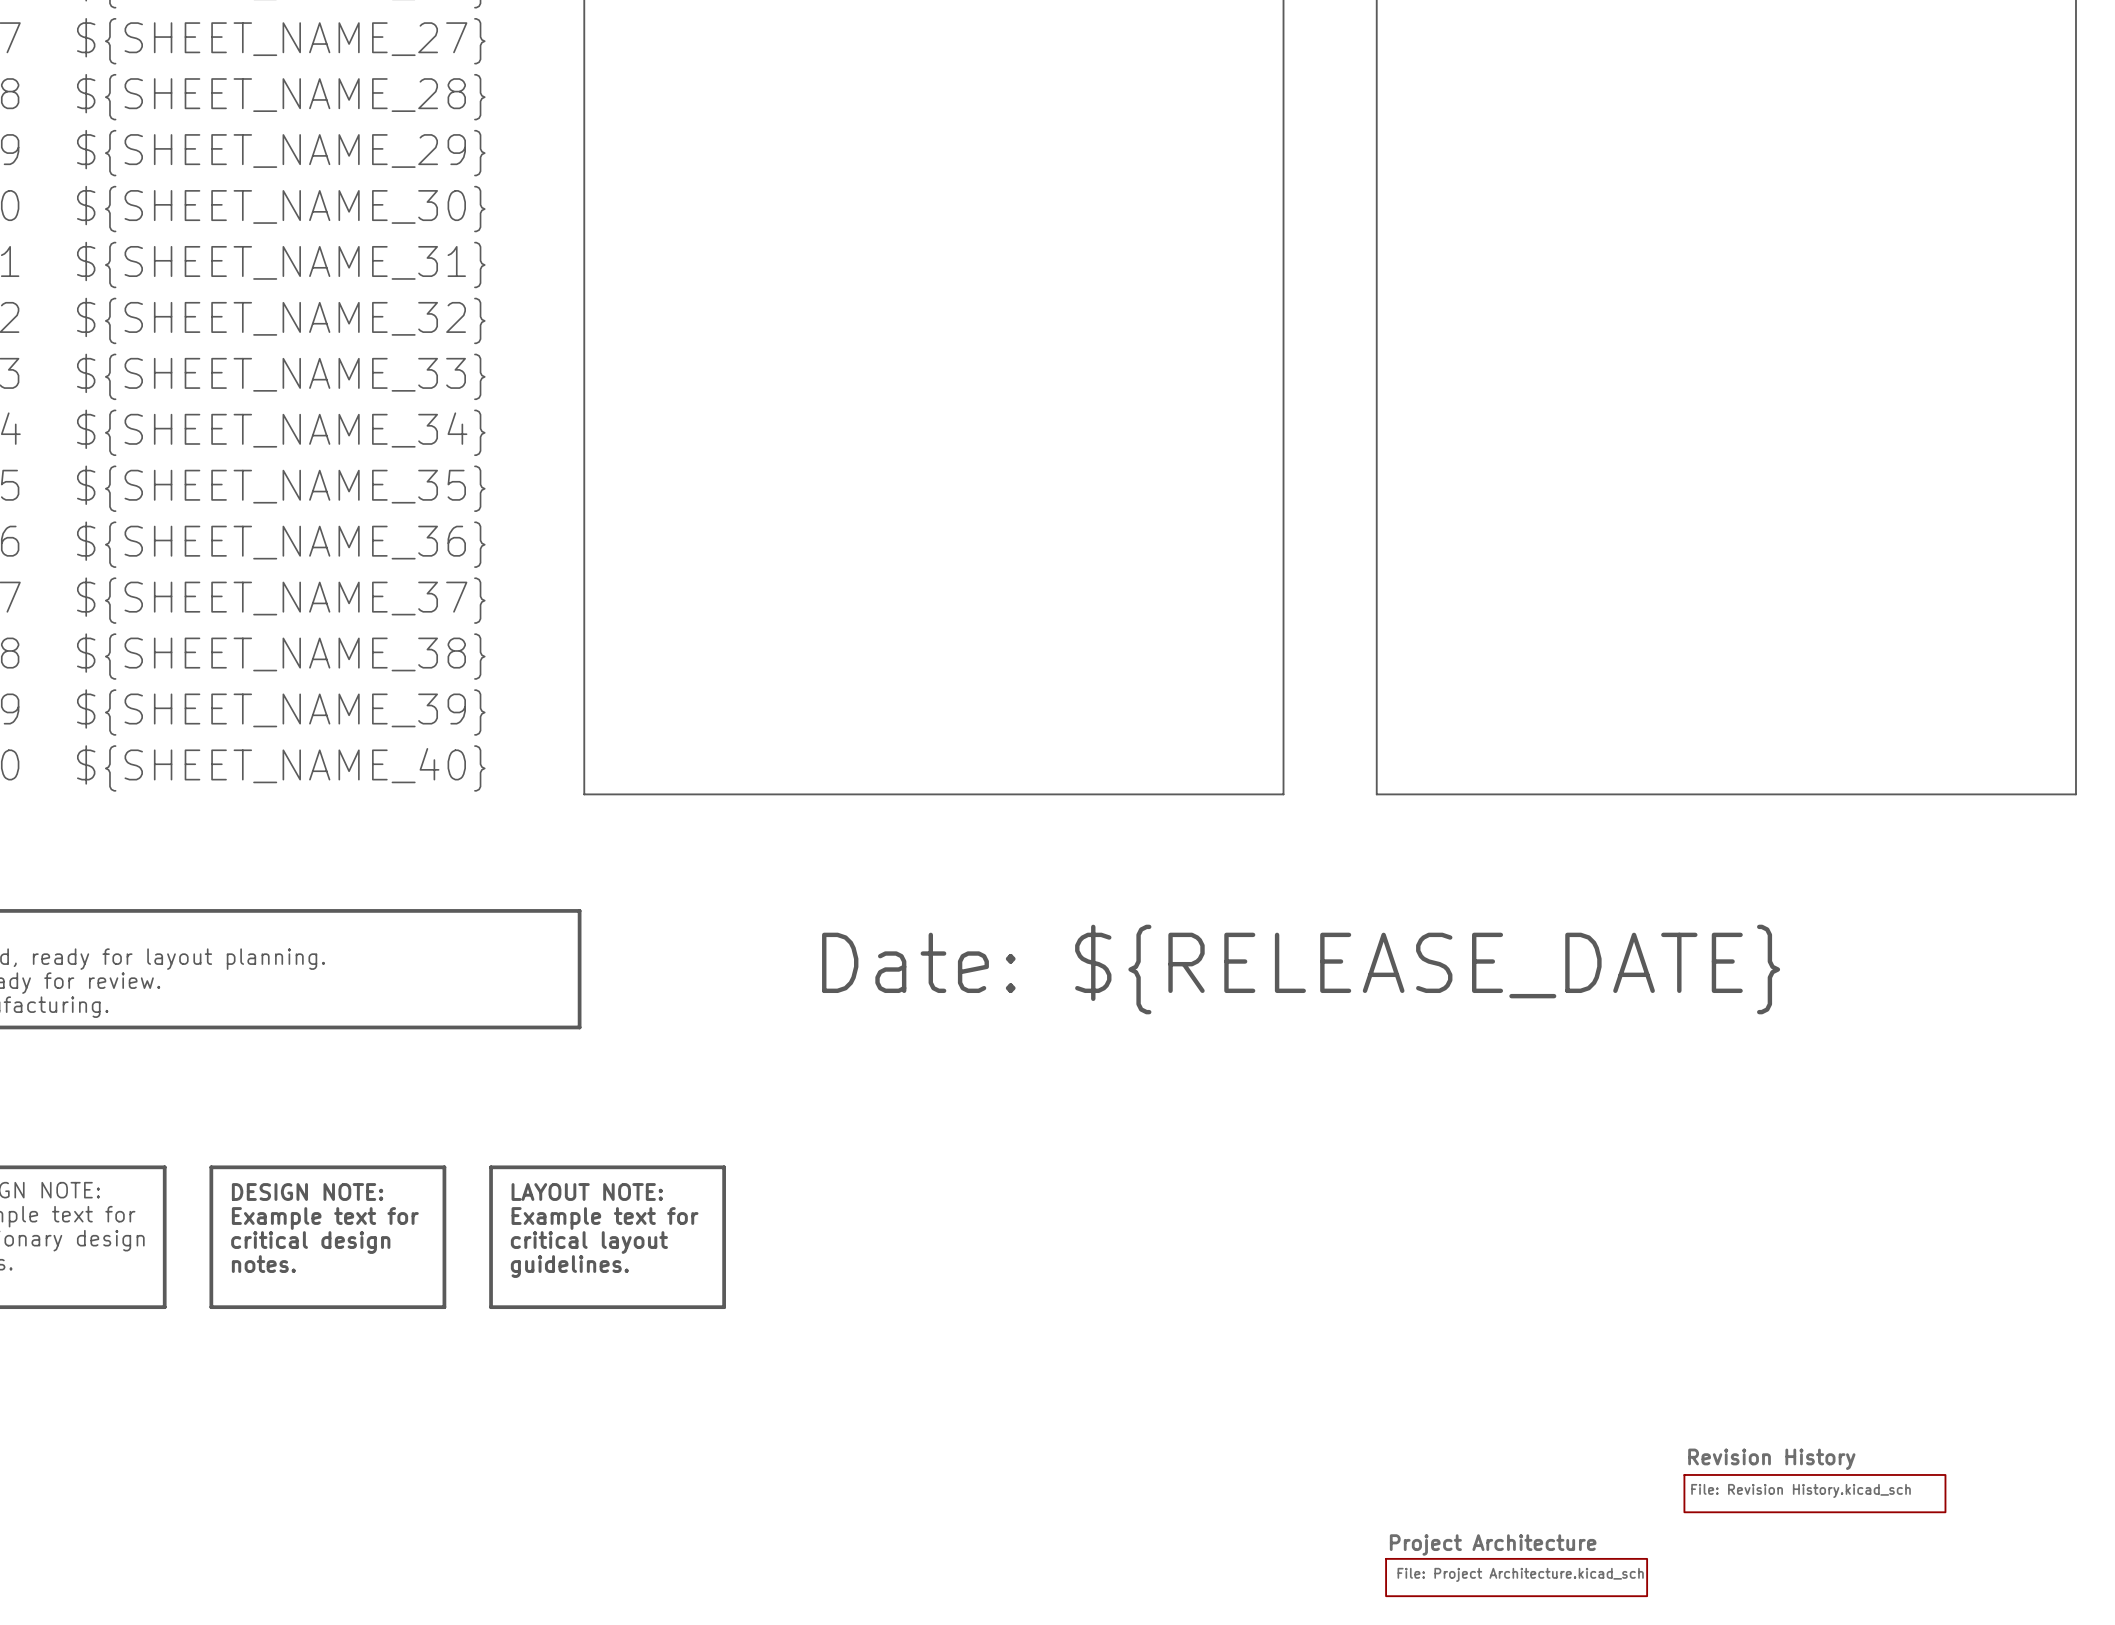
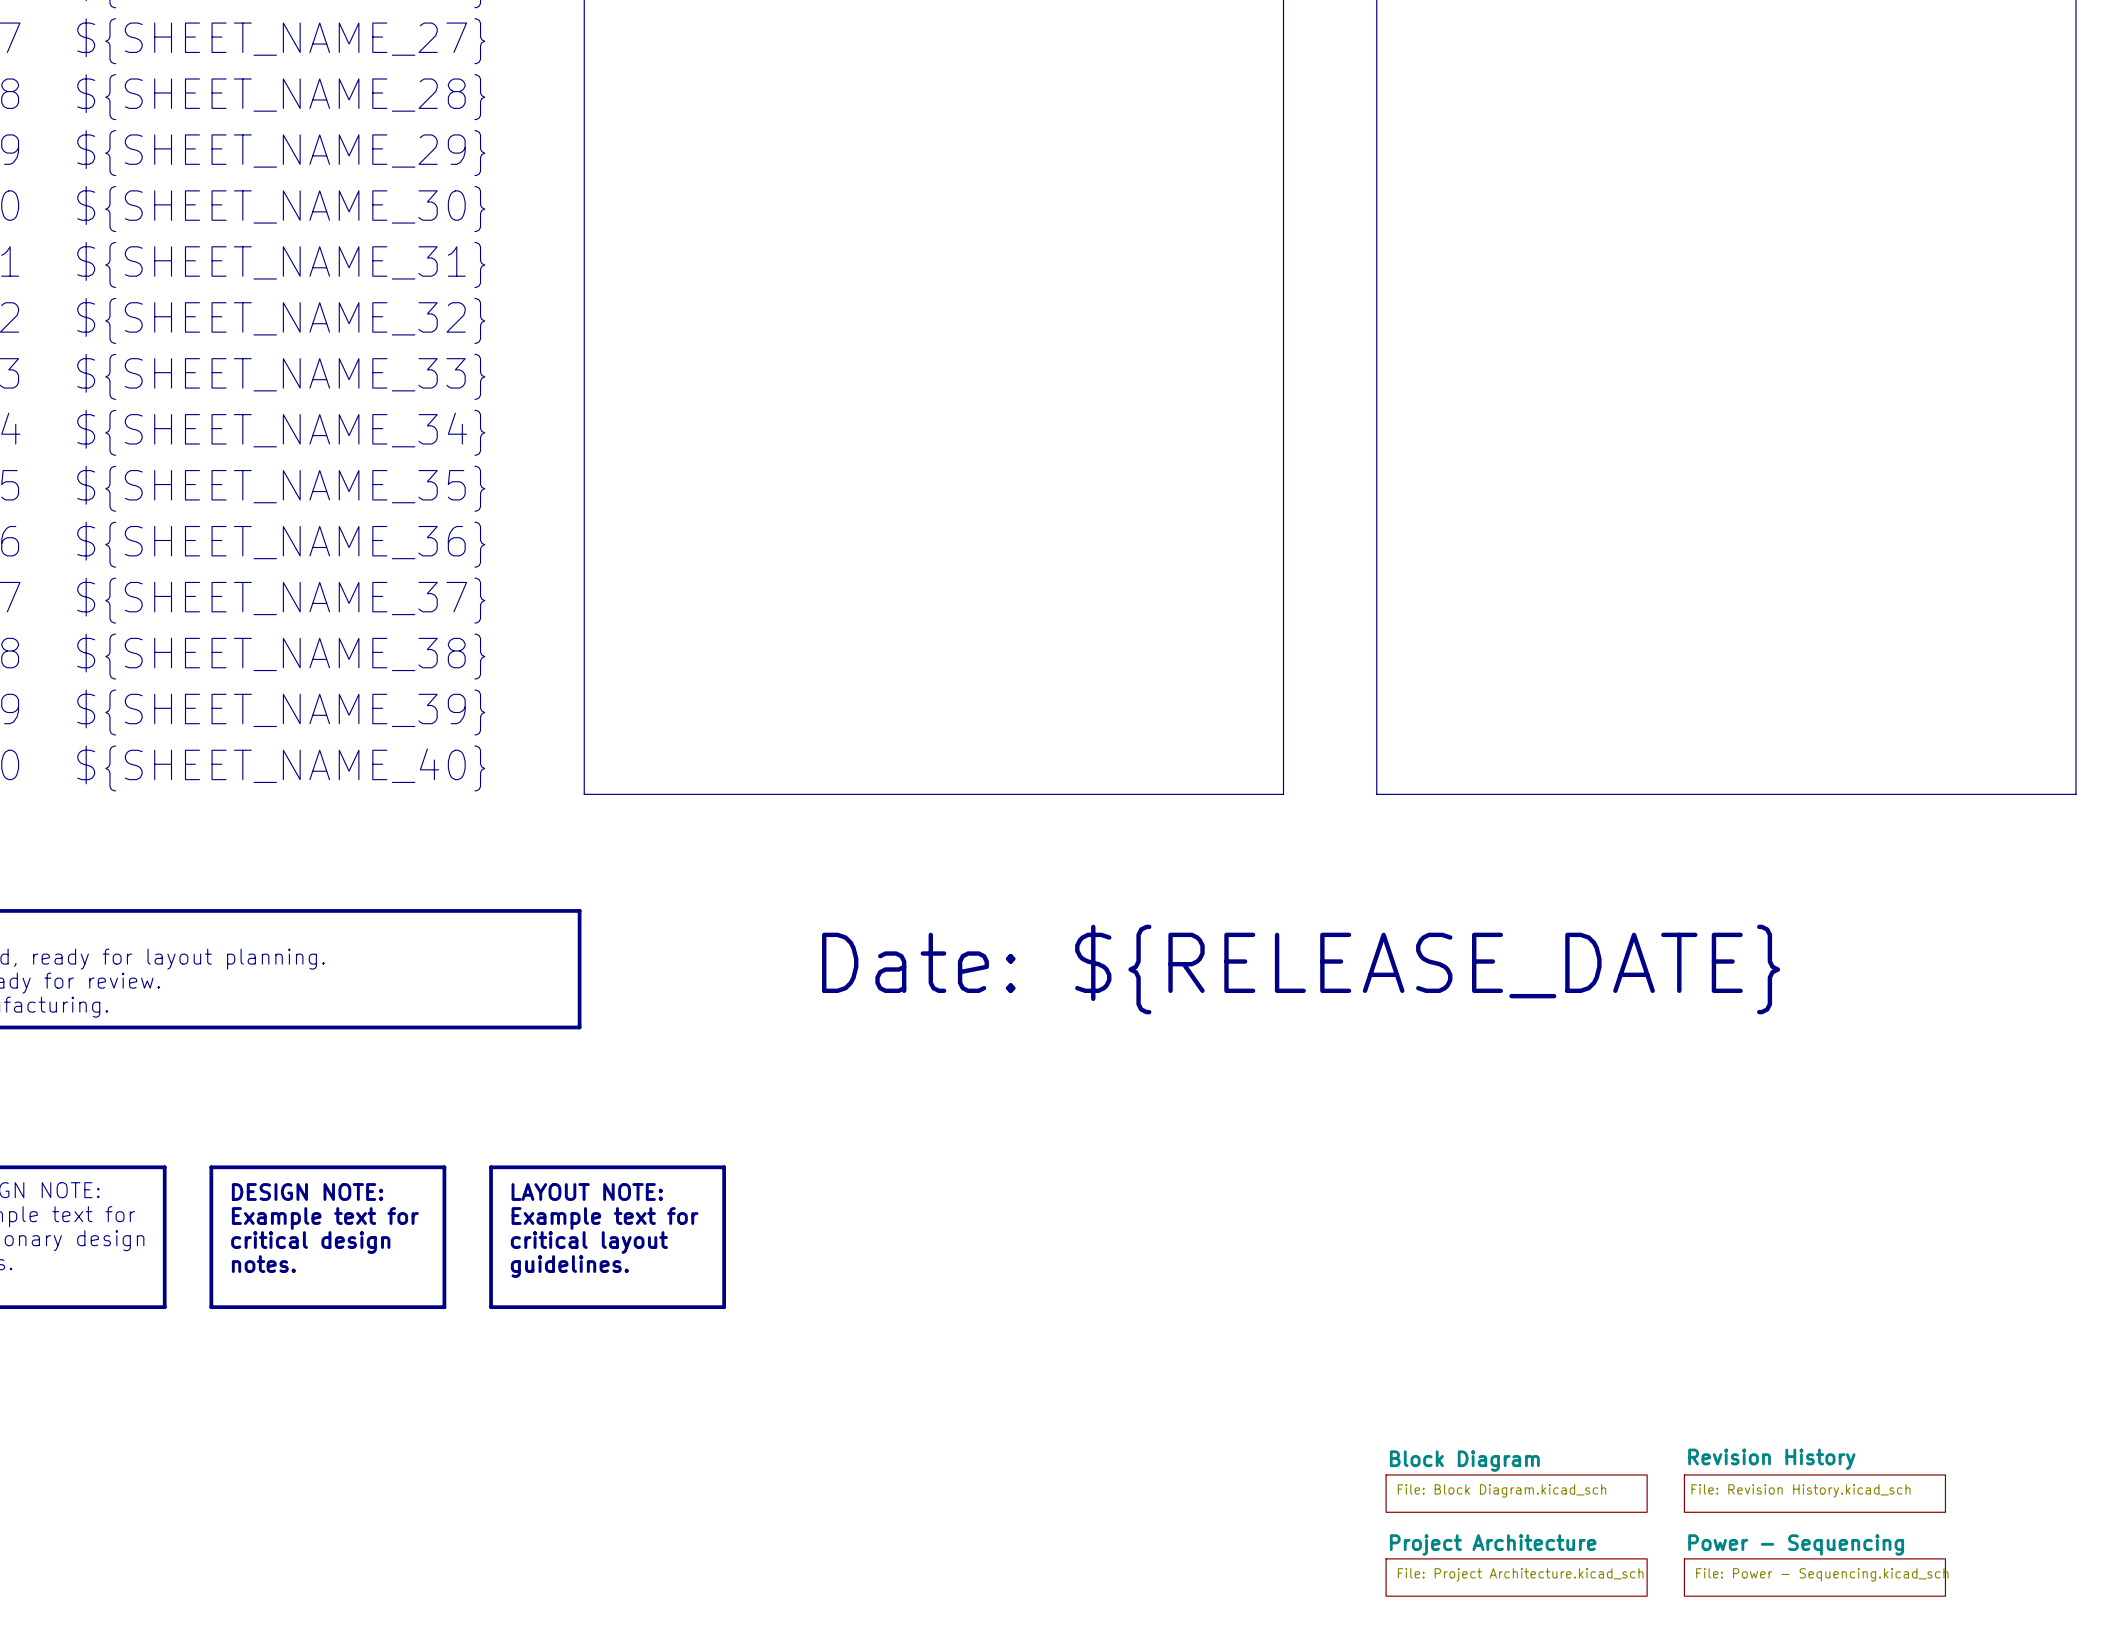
sheet Block Diagram: none -> File: Block Diagram.kicad_sch (1516, 1493)
sheet Power - Sequencing: none -> File: Power - Sequencing.kicad_sch (1814, 1577)

